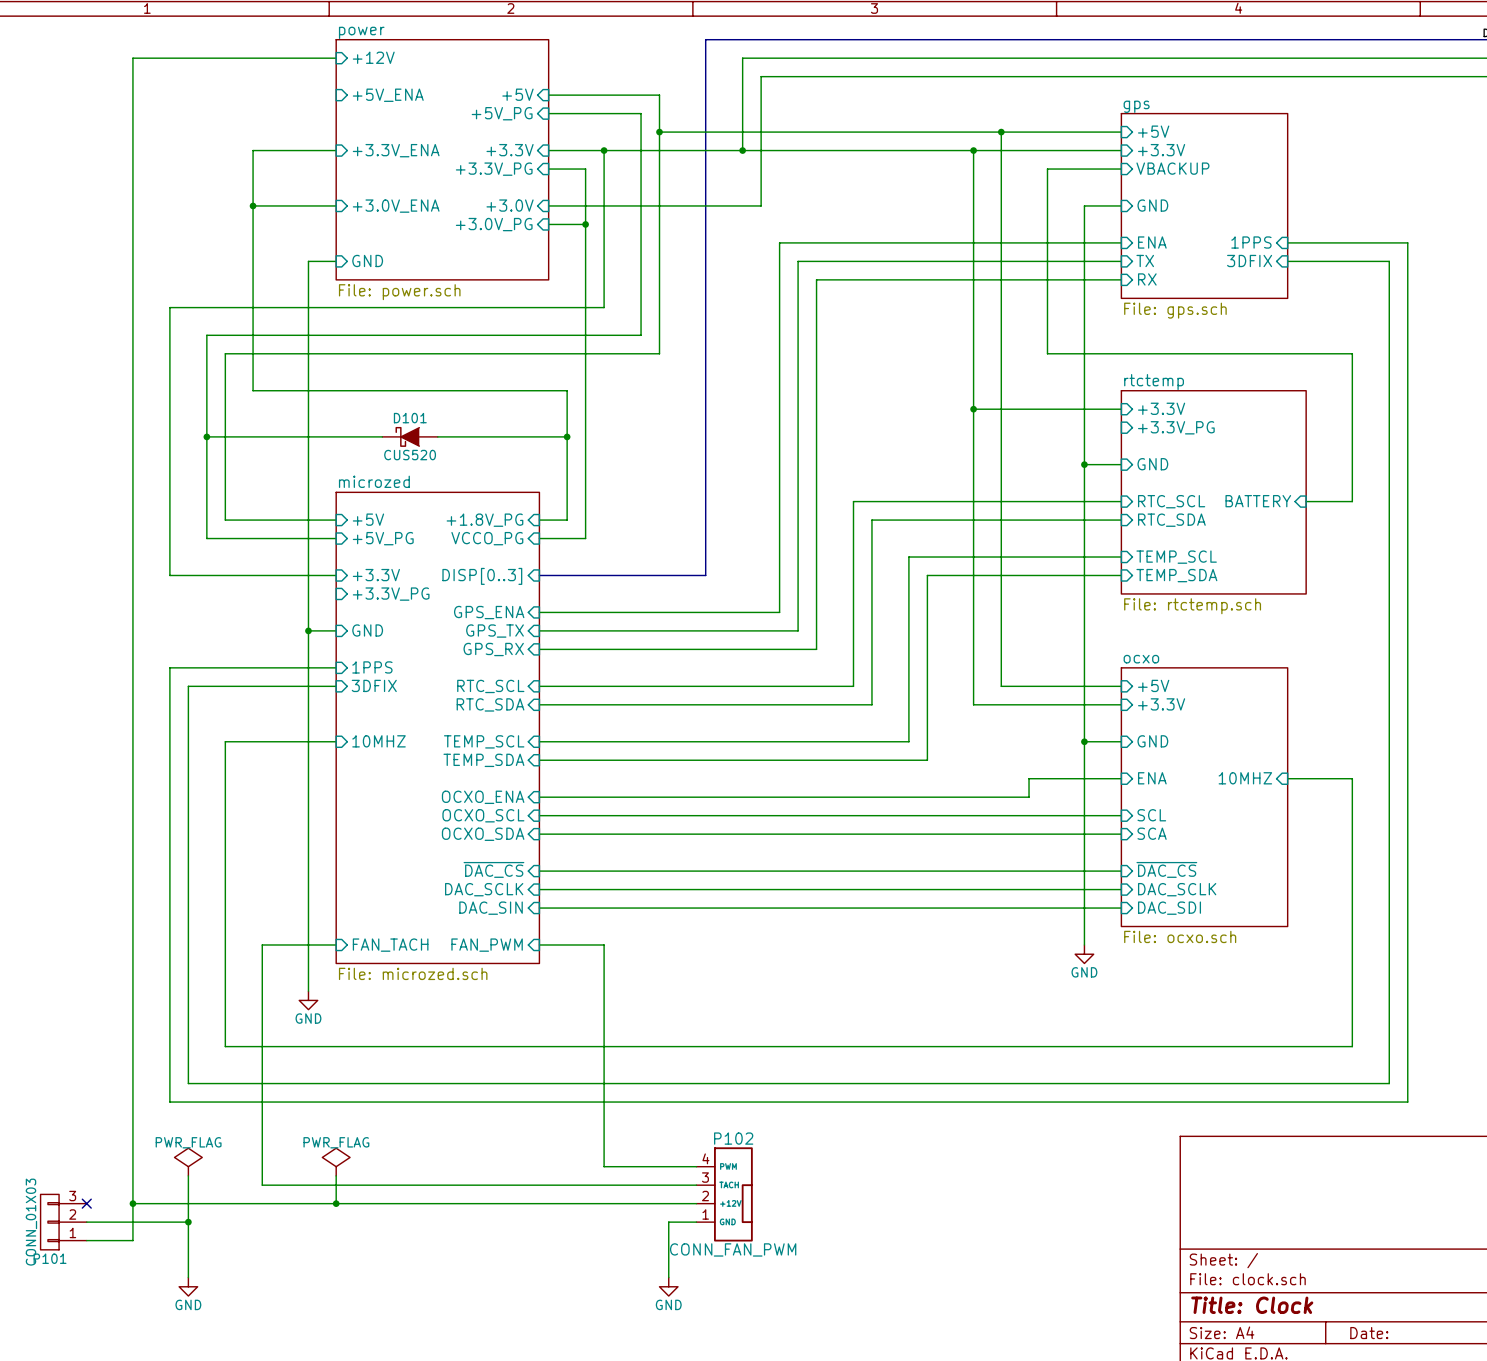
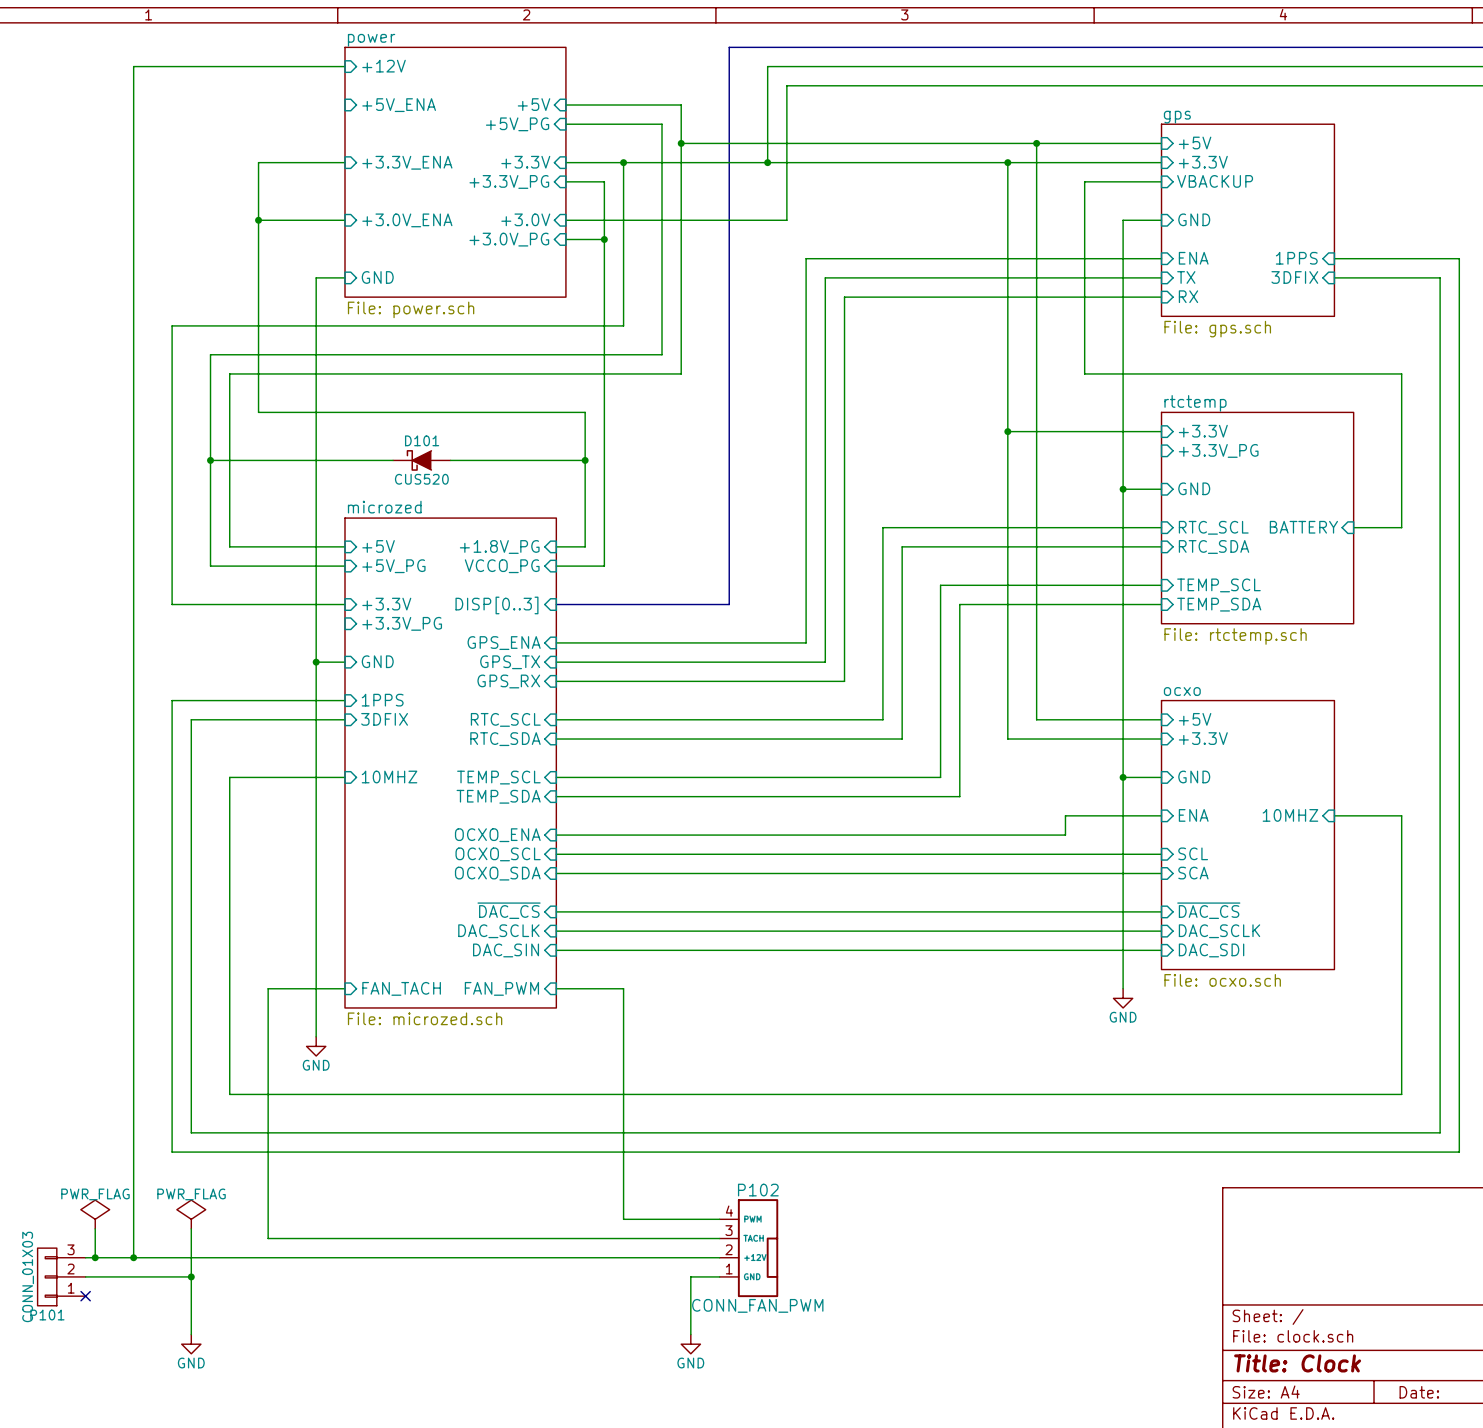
power symbol: none -> PWR_FLAG (95, 1214)
power symbol: PWR_FLAG (336, 1162) -> none
wire: none -> (95, 1228) (95, 1257)
wire: (336, 1175) (336, 1203) -> none
no-connect mark position: (86, 1203) -> (85, 1296)
junction: none -> (95, 1257)
wire: (132, 1203) (132, 1240) (86, 1240) -> (133, 1257) (85, 1257)
junction: (336, 1203) -> none

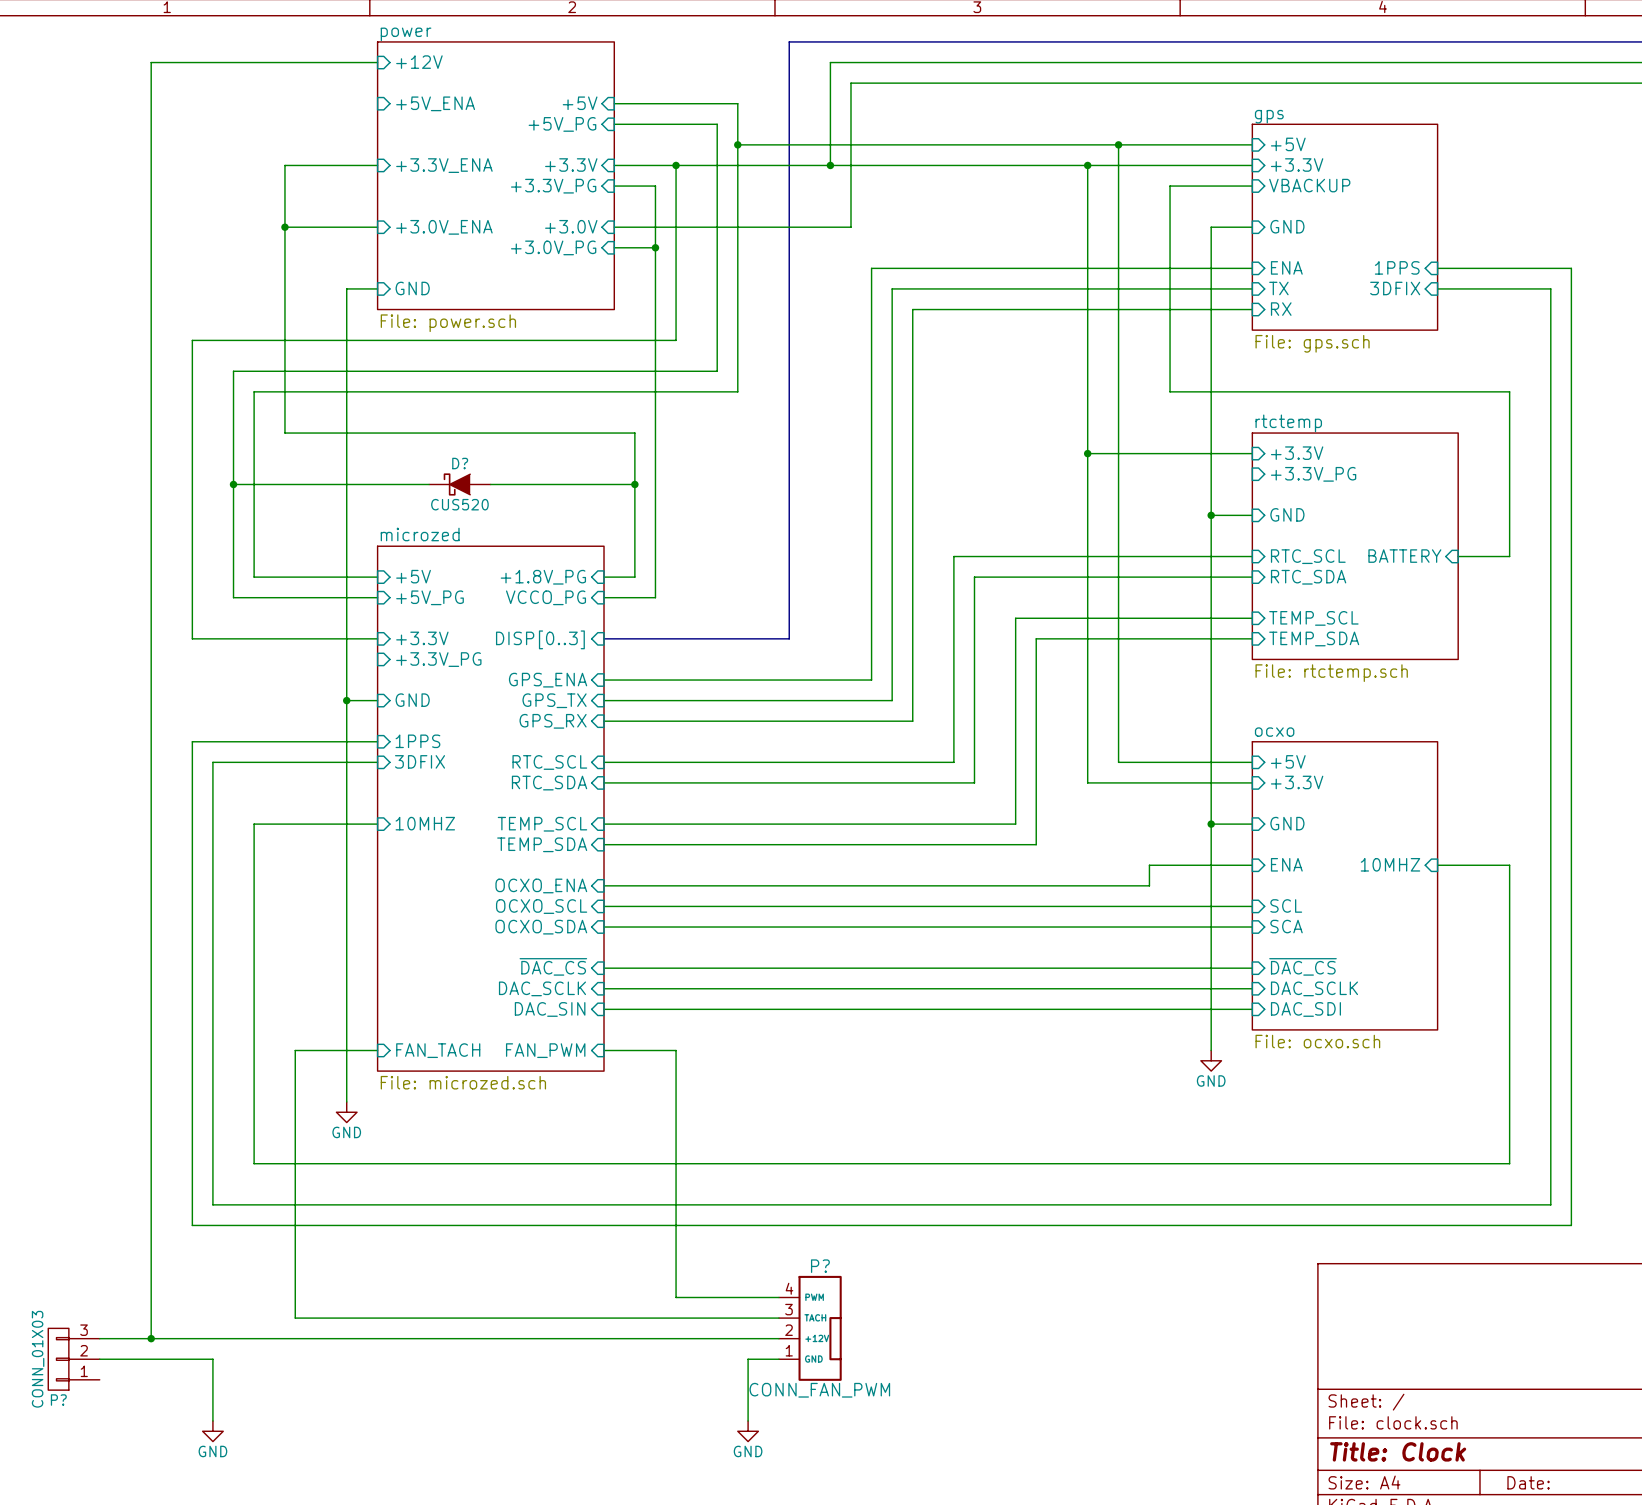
D101 name: D101 (422, 440) -> D? (460, 463)
P102 name: P102 (758, 1190) -> P? (820, 1266)
power symbol: PWR_FLAG (95, 1214) -> none
power symbol: PWR_FLAG (191, 1214) -> none
wire: (95, 1228) (95, 1257) -> none
wire: (191, 1228) (191, 1276) -> none
junction: (95, 1257) -> none
junction: (191, 1276) -> none
no-connect mark: (85, 1296) -> none
P101 name: P101 (47, 1315) -> P? (58, 1400)

